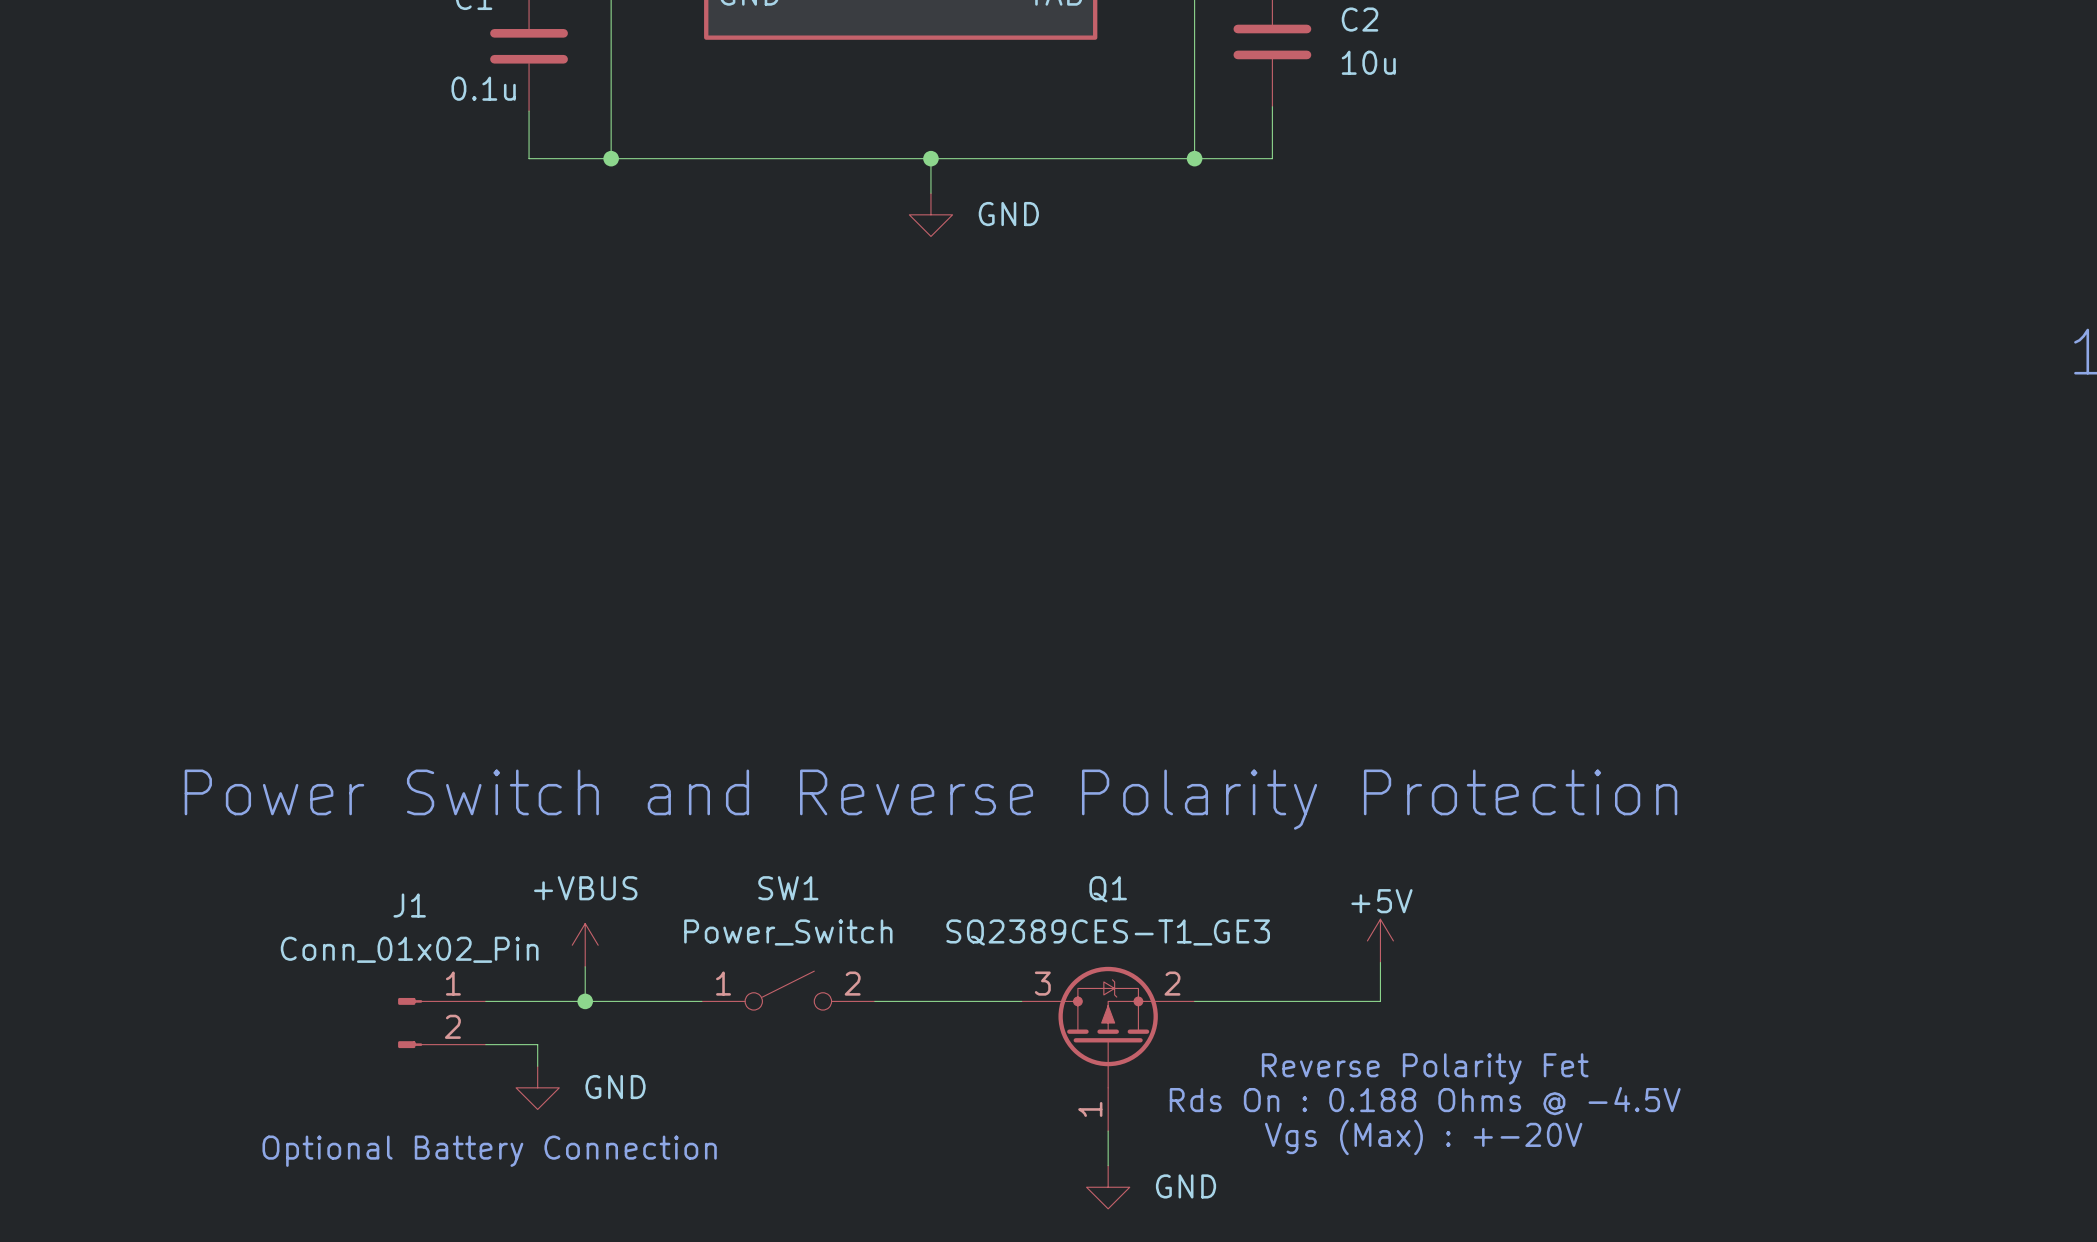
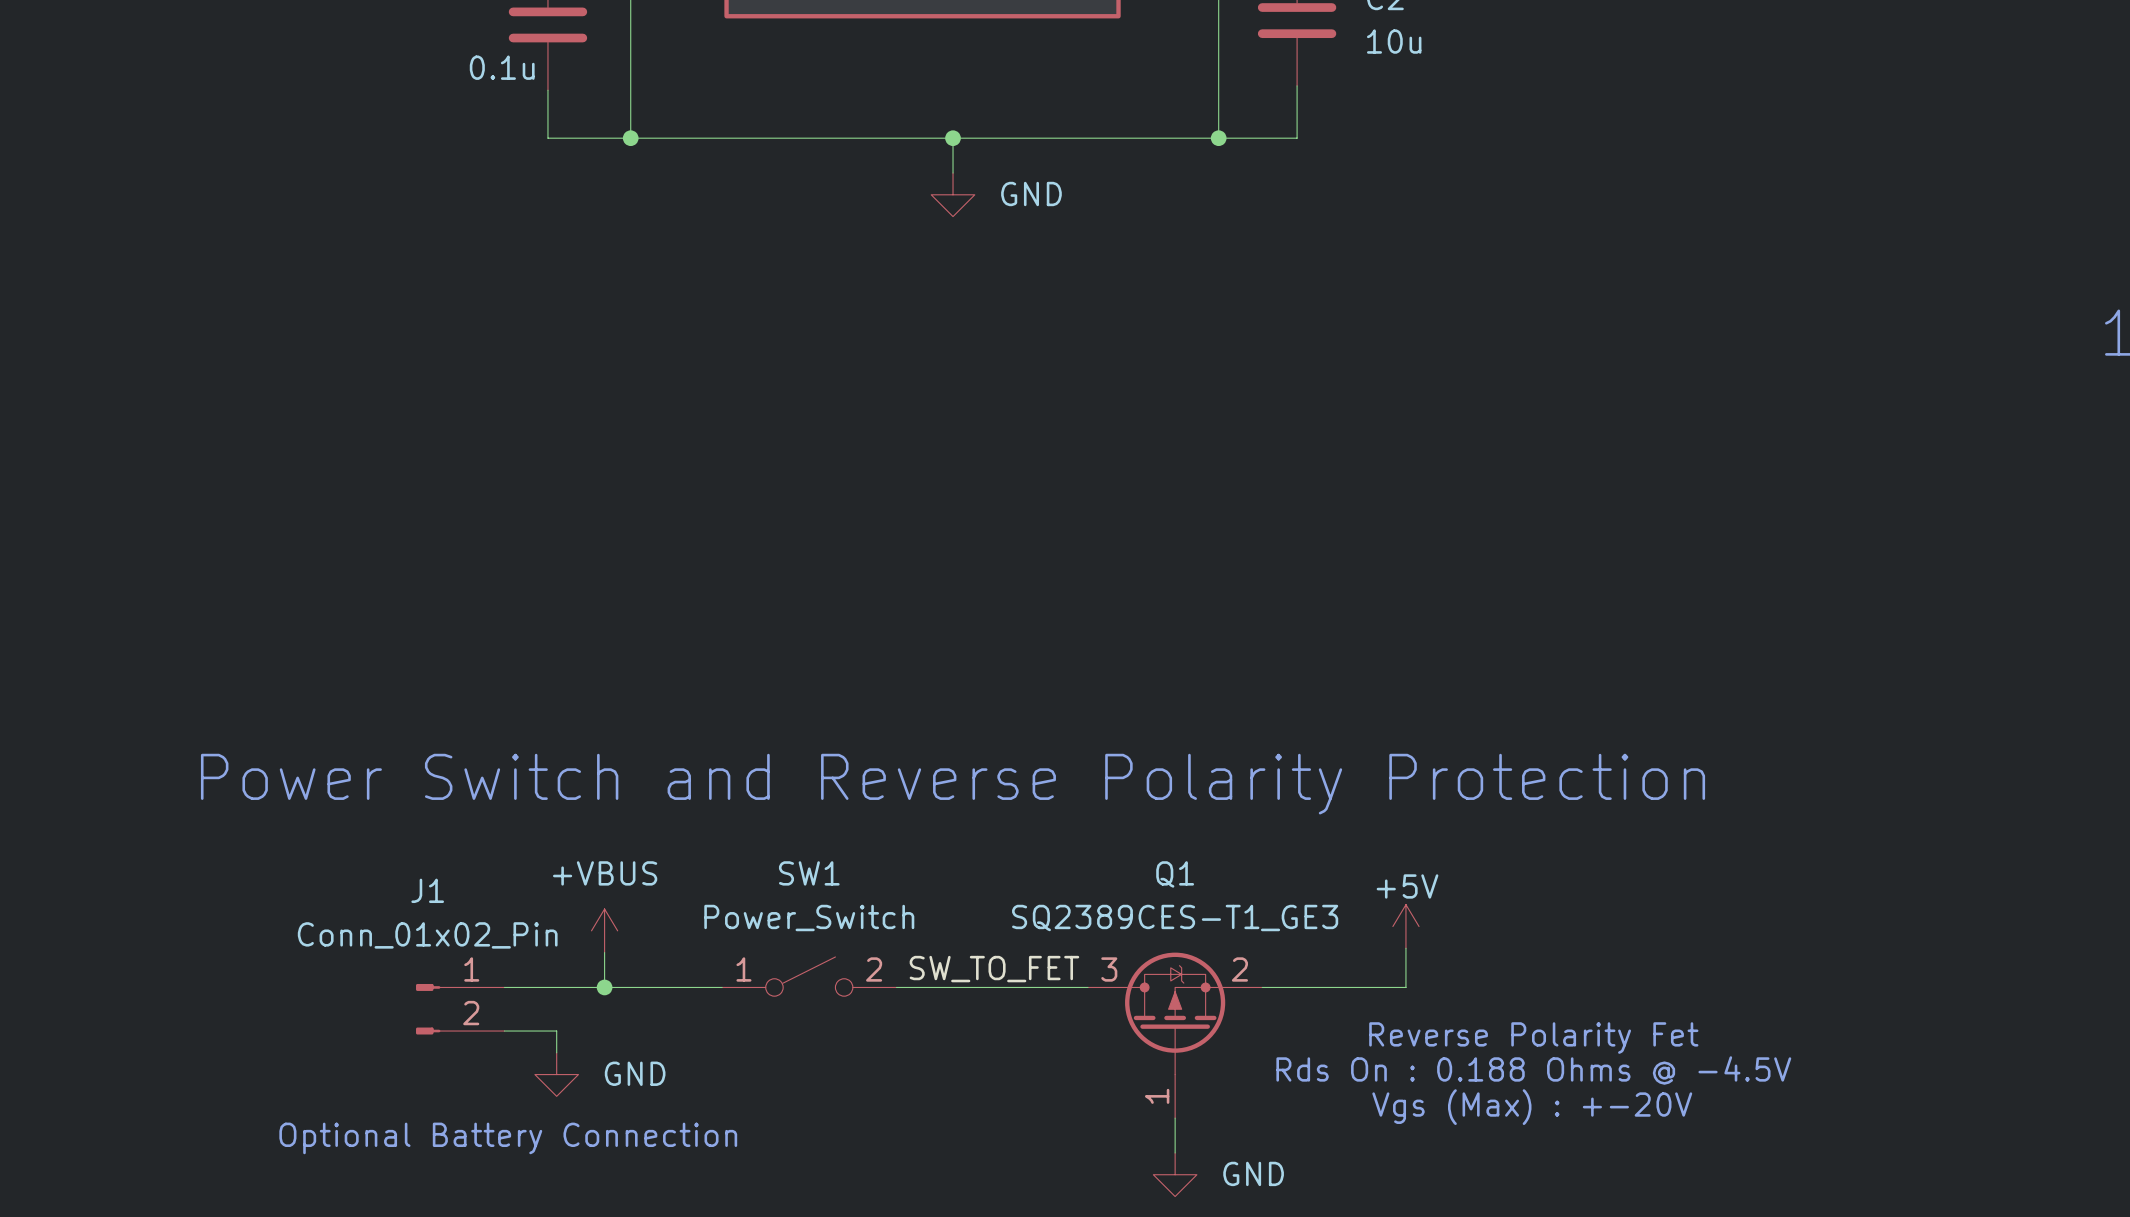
label: none -> SW_TO_FET (994, 969)
Q1 position: (1108, 1048) -> (1175, 1035)
text position: Reverse Polarity Fet (1425, 1068) -> Reverse Polarity Fet (1533, 1038)
text position: Rds On : 0.188 Ohms @ -4.5V (1425, 1101) -> Rds On : 0.188 Ohms @ -4.5V (1533, 1070)
wire: (1108, 1131) (1108, 1165) -> (1175, 1118) (1175, 1152)
text position: Vgs (Max) : +-20V (1423, 1137) -> Vgs (Max) : +-20V (1532, 1107)
power symbol position: GND (1108, 1187) -> GND (1175, 1174)

